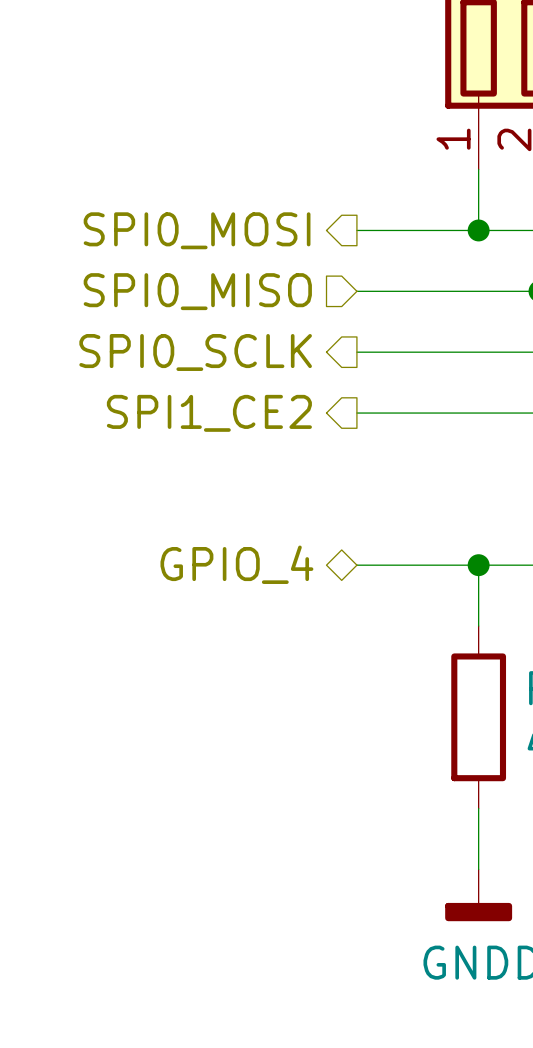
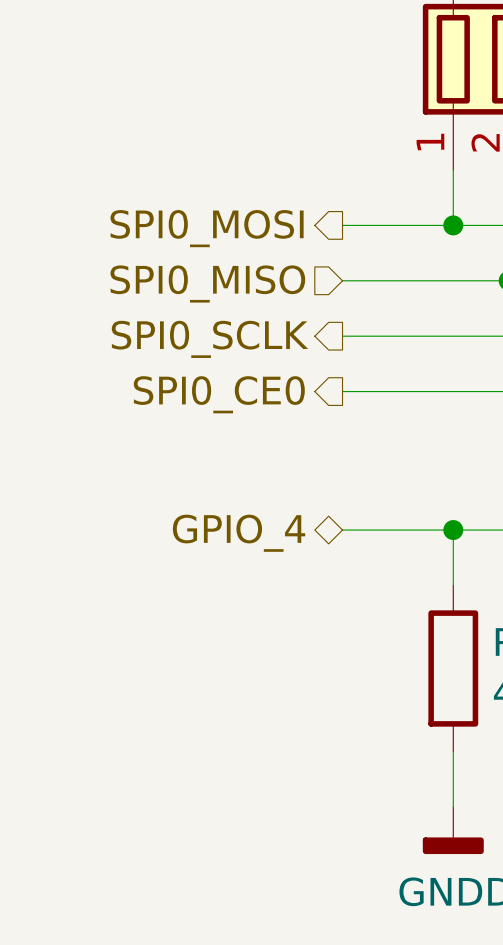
hierarchical label: SPI1_CE2 (209, 413) -> SPI0_CE0 (219, 394)

